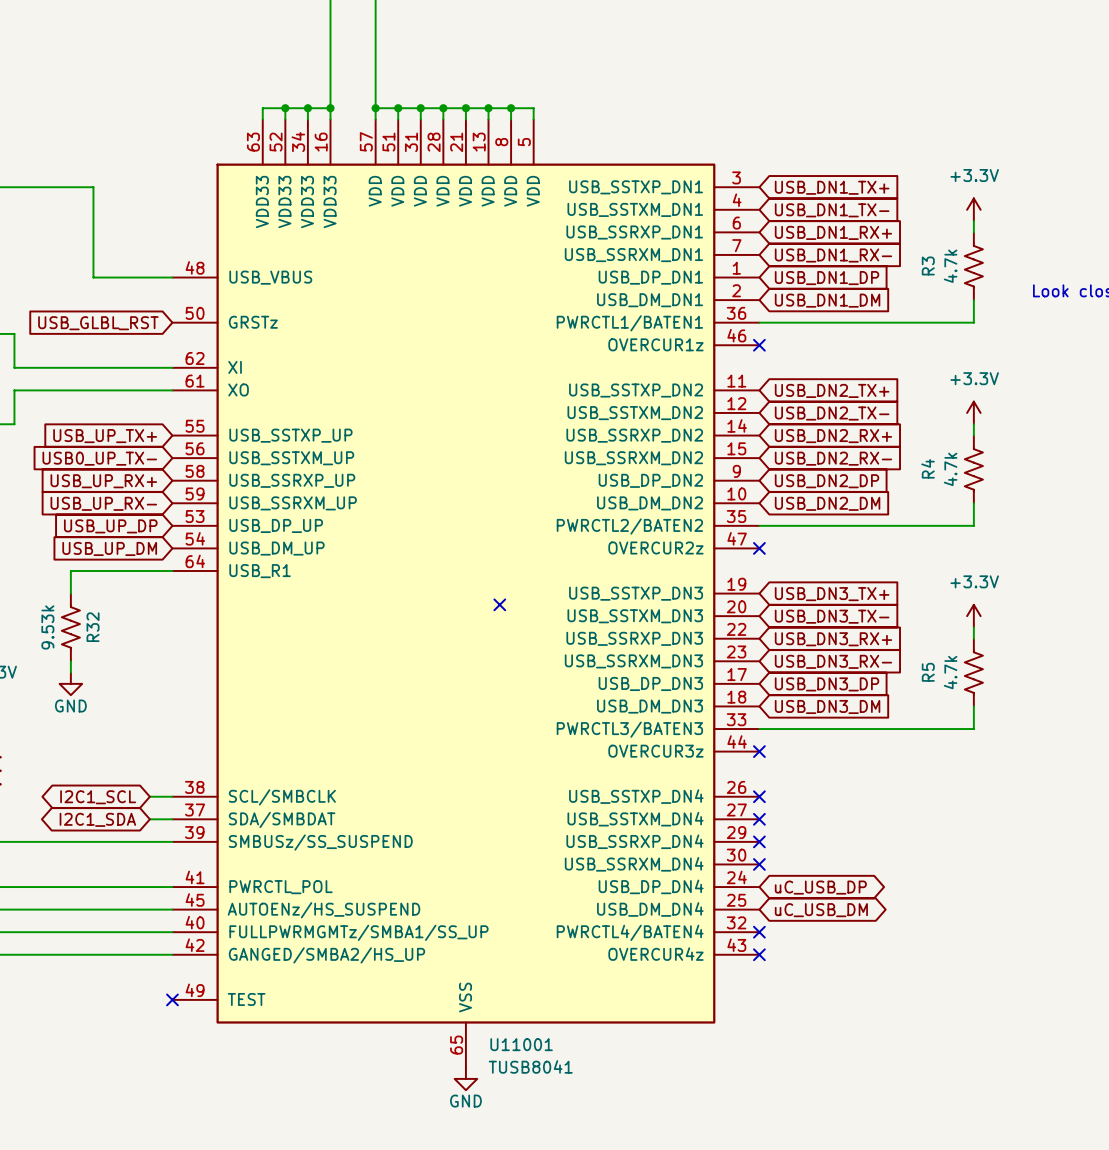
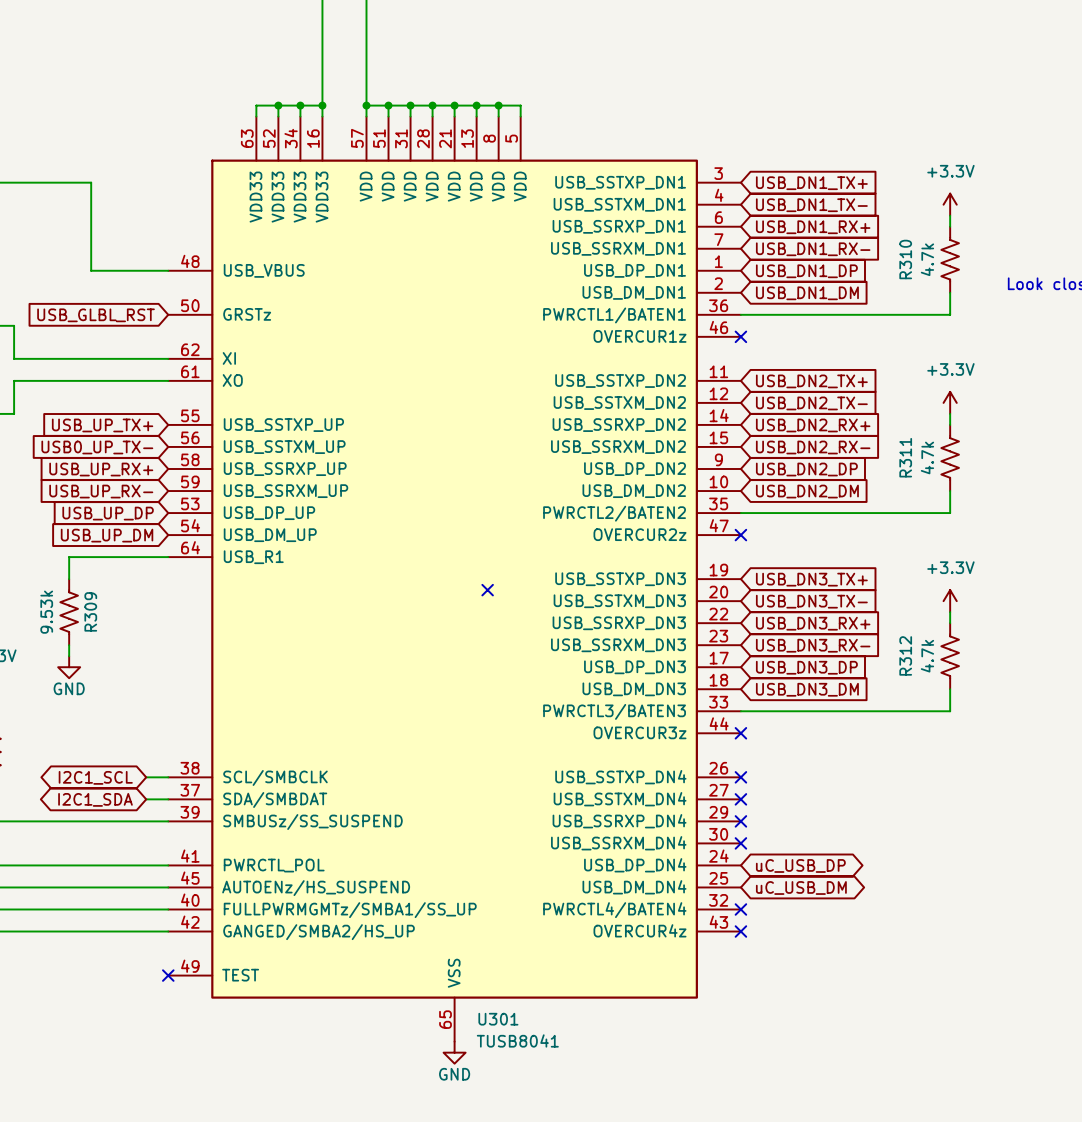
R3 name: R3 (928, 265) -> R310 (905, 259)
R4 name: R4 (928, 468) -> R311 (905, 457)
R32 name: R32 (93, 627) -> R309 (90, 611)
R5 name: R5 (928, 672) -> R312 (905, 655)
U11001 name: U11001 (521, 1044) -> U301 (498, 1019)

